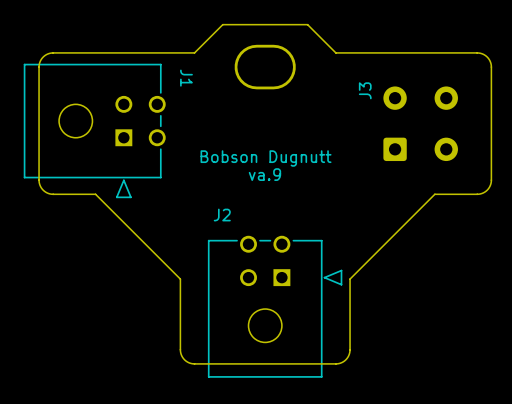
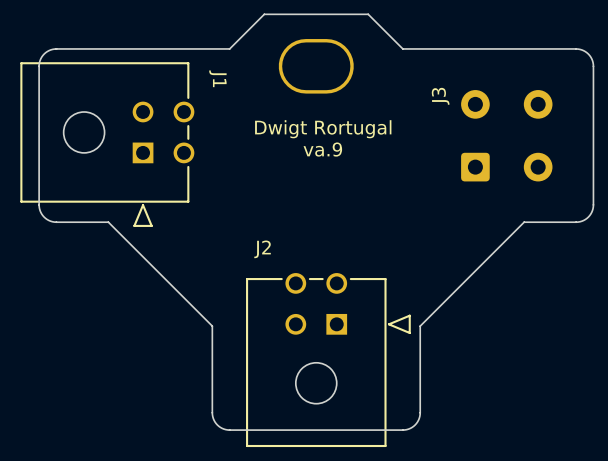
text: none -> Dwigt Rortugal (323, 129)
text: Bobson Dugnutt (266, 158) -> none
text position: va.9 (264, 174) -> va.9 (322, 149)

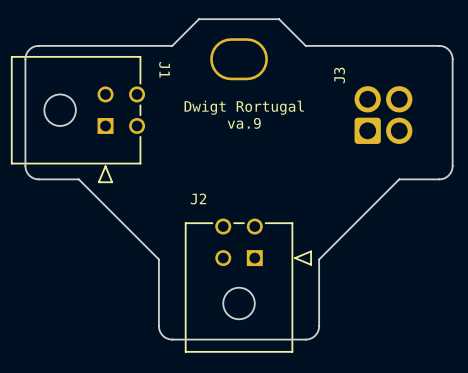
J3 footprint: [461, 90, 553, 182] -> [354, 86, 413, 144]

